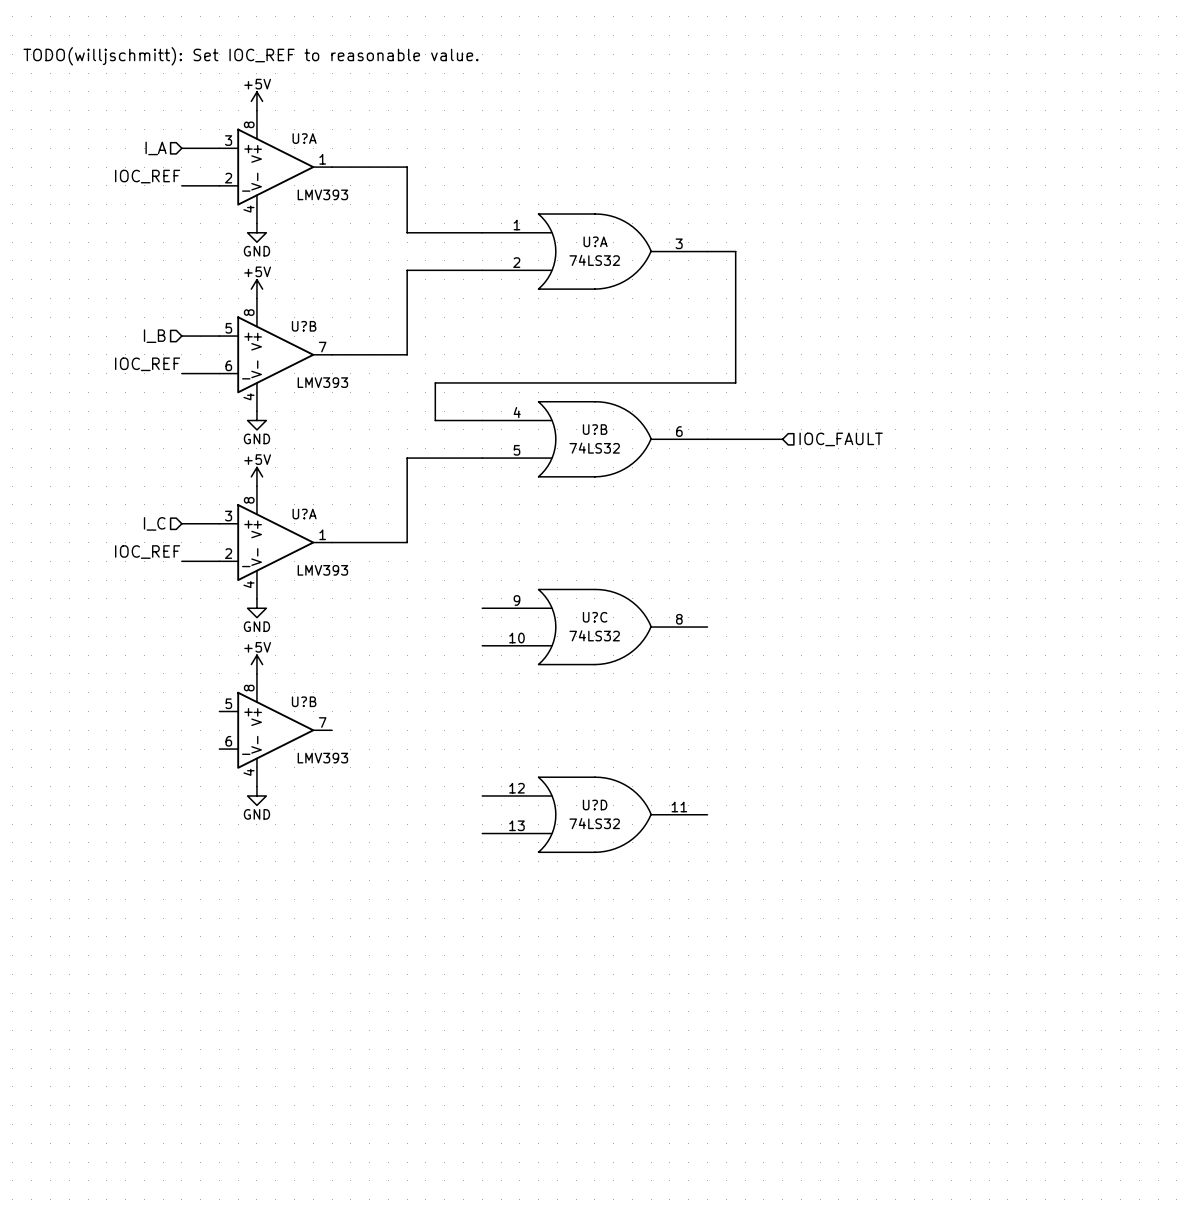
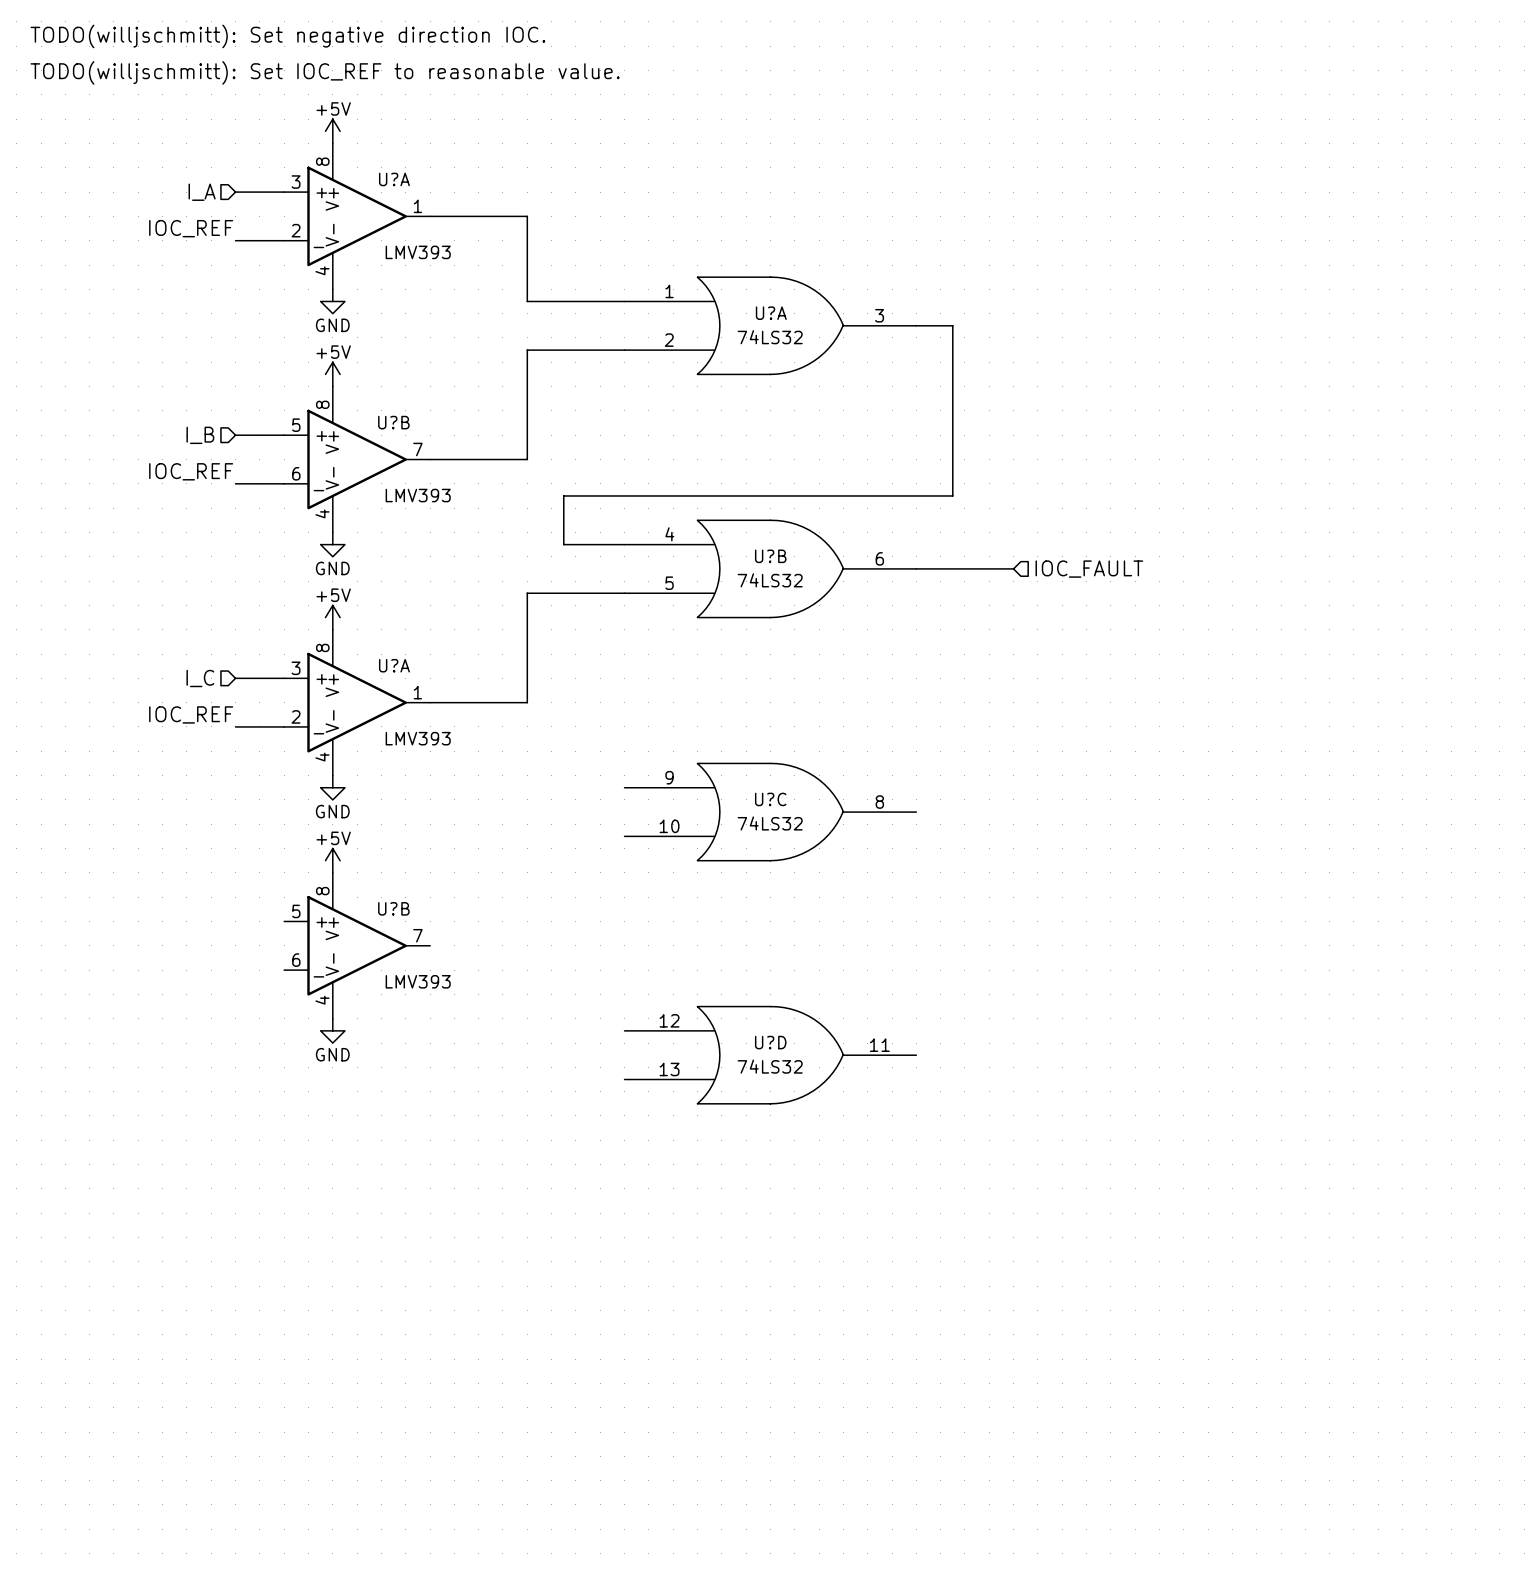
text: none -> TODO(willjschmitt): Set negative direction IOC. (287, 36)

